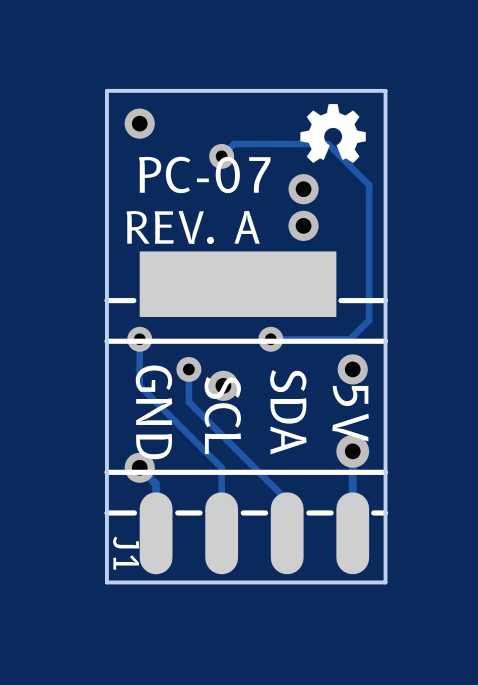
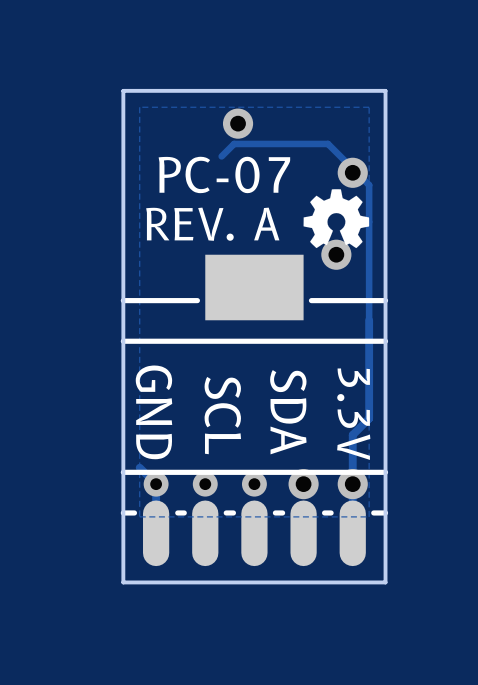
board edge: (123, 90) (106, 90) (106, 582) (123, 582) -> (123, 90) (123, 582)
zone outline: none -> (369, 107) (369, 516) (139, 516) (139, 107) (369, 107)
via: (139, 123) -> none
via: none -> (238, 123)
drawing position: (333, 133) -> (336, 218)
via: (221, 156) -> none
via: none -> (352, 172)
text position: PC-07 (204, 174) -> PC-07 (224, 174)
via: (303, 189) -> none
via: (303, 225) -> none
text position: REV. A (193, 227) -> REV. A (212, 224)
part footprint: [139, 251, 337, 317] -> [205, 254, 304, 321]
via: none -> (336, 254)
line: (123, 300) (106, 300) -> none
line: none -> (197, 300) (133, 300)
line: none -> (340, 300) (311, 300)
track: (369, 320) (350, 339) (270, 339) -> (369, 320) (369, 418) (352, 434) (352, 451)
track: (139, 339) (139, 385) (221, 467) (221, 533) -> none
via: (139, 339) -> none
via: (270, 339) -> none
line: (123, 341) (106, 341) -> none
track: (188, 369) (188, 402) (287, 500) (287, 533) -> none
via: (188, 369) -> none
via: (352, 369) -> none
via: (223, 385) -> none
text: 5V (350, 413) -> none
text: none -> 3.3V (353, 414)
via: (352, 451) -> none
via position: (139, 467) -> (156, 484)
line: (123, 472) (106, 472) -> none
via: none -> (205, 484)
via: none -> (254, 484)
via: none -> (303, 484)
via: none -> (352, 484)
line: (123, 512) (106, 512) -> none
line: (200, 512) (184, 512) -> none
line: none -> (233, 512) (226, 512)
line: (265, 512) (243, 512) -> none
line: none -> (282, 512) (275, 512)
line: (324, 512) (308, 512) -> none
J1: (254, 533) -> none
part: none -> (254, 533)

